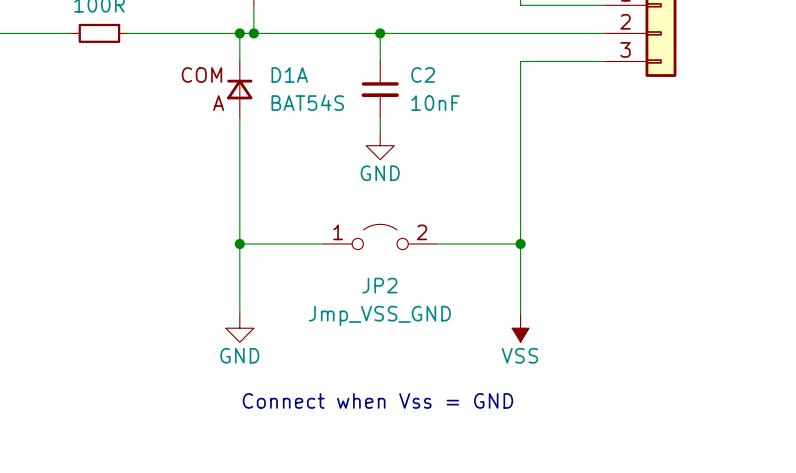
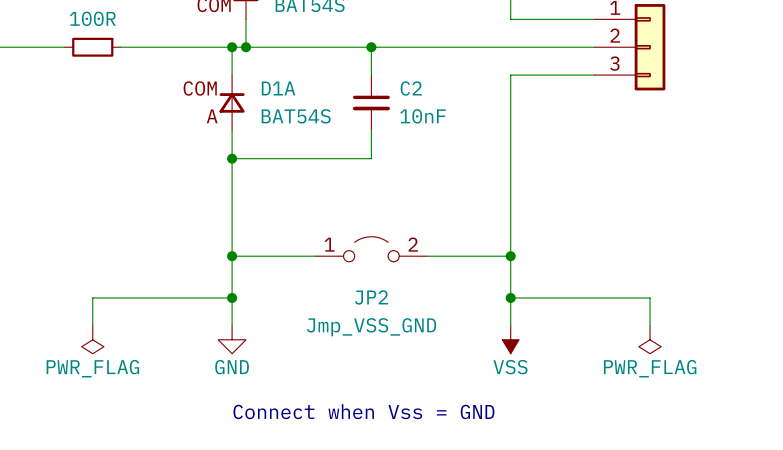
wire: none -> (371, 144) (371, 158) (232, 158)
junction: none -> (232, 158)
power symbol: GND (380, 145) -> none
wire: none -> (232, 297) (92, 297) (92, 325)
junction: none -> (232, 297)
wire: none -> (510, 297) (650, 297) (650, 325)
junction: none -> (510, 297)
power symbol: none -> PWR_FLAG (92, 339)
power symbol: none -> PWR_FLAG (650, 339)

